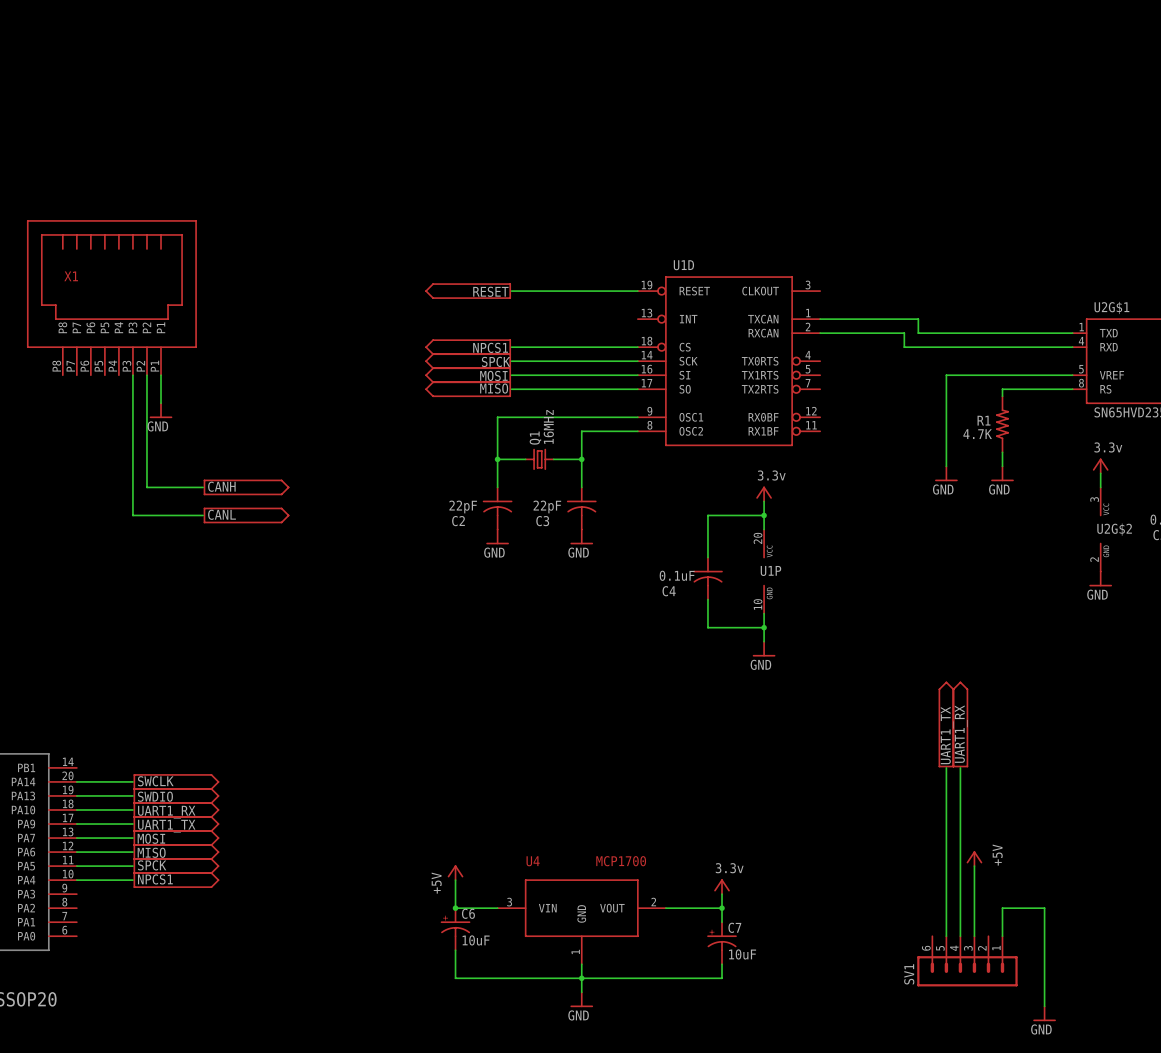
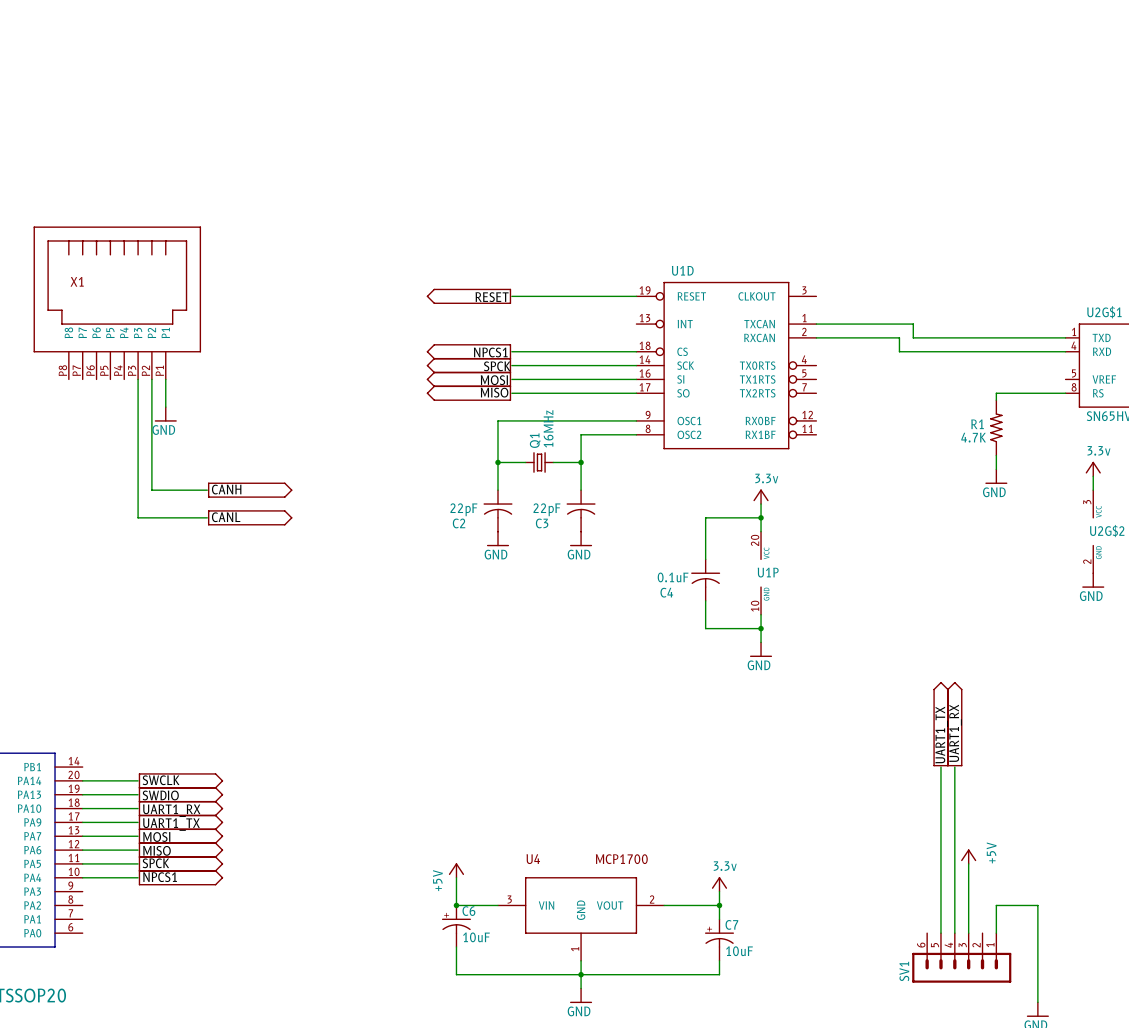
wire: (1072, 375) (946, 375) (946, 466) -> none
power symbol: GND (946, 473) -> none

